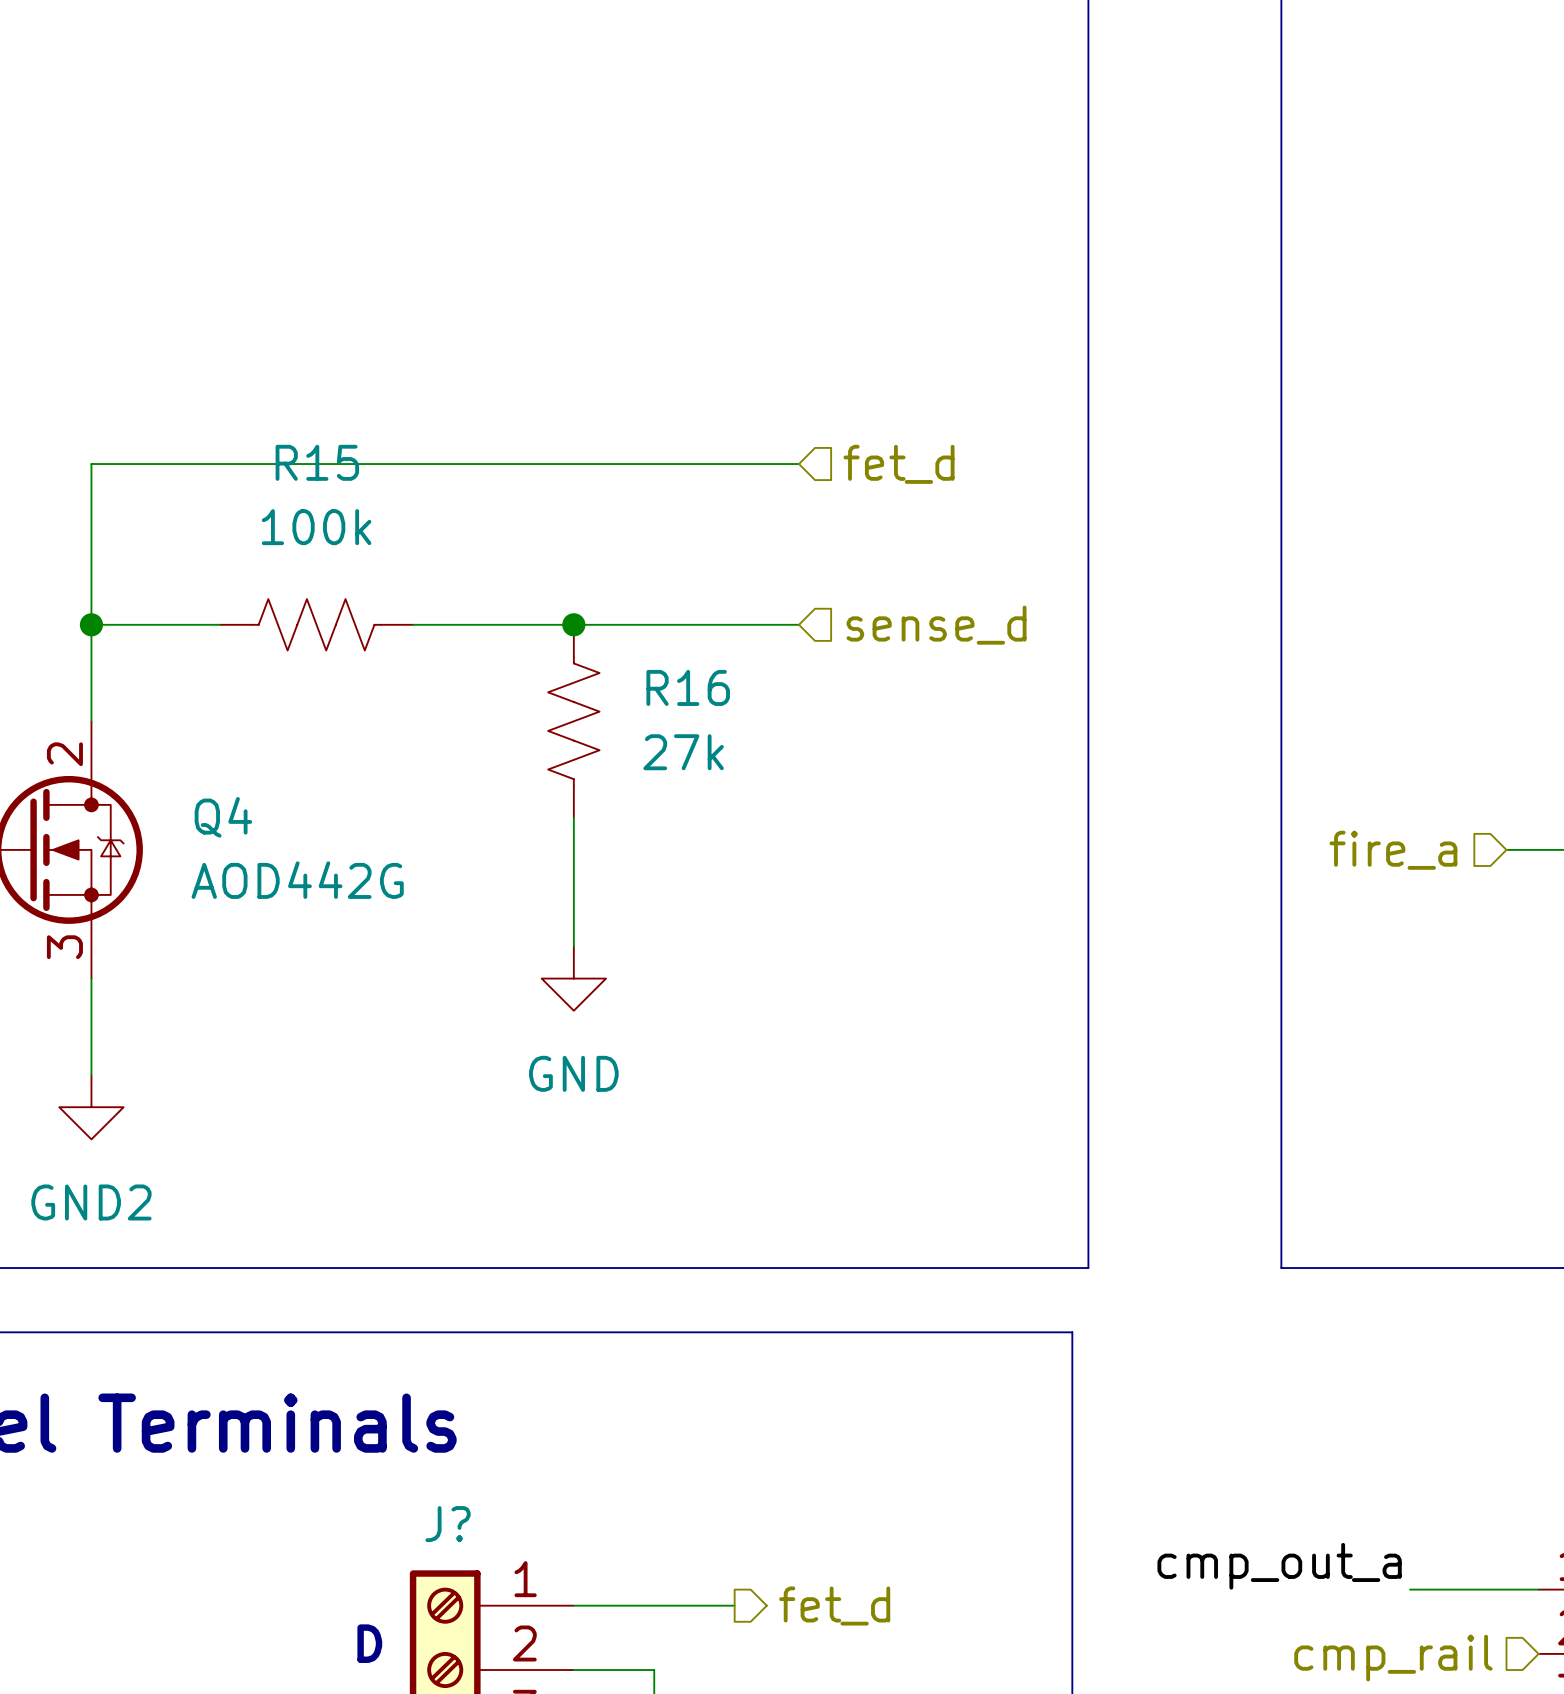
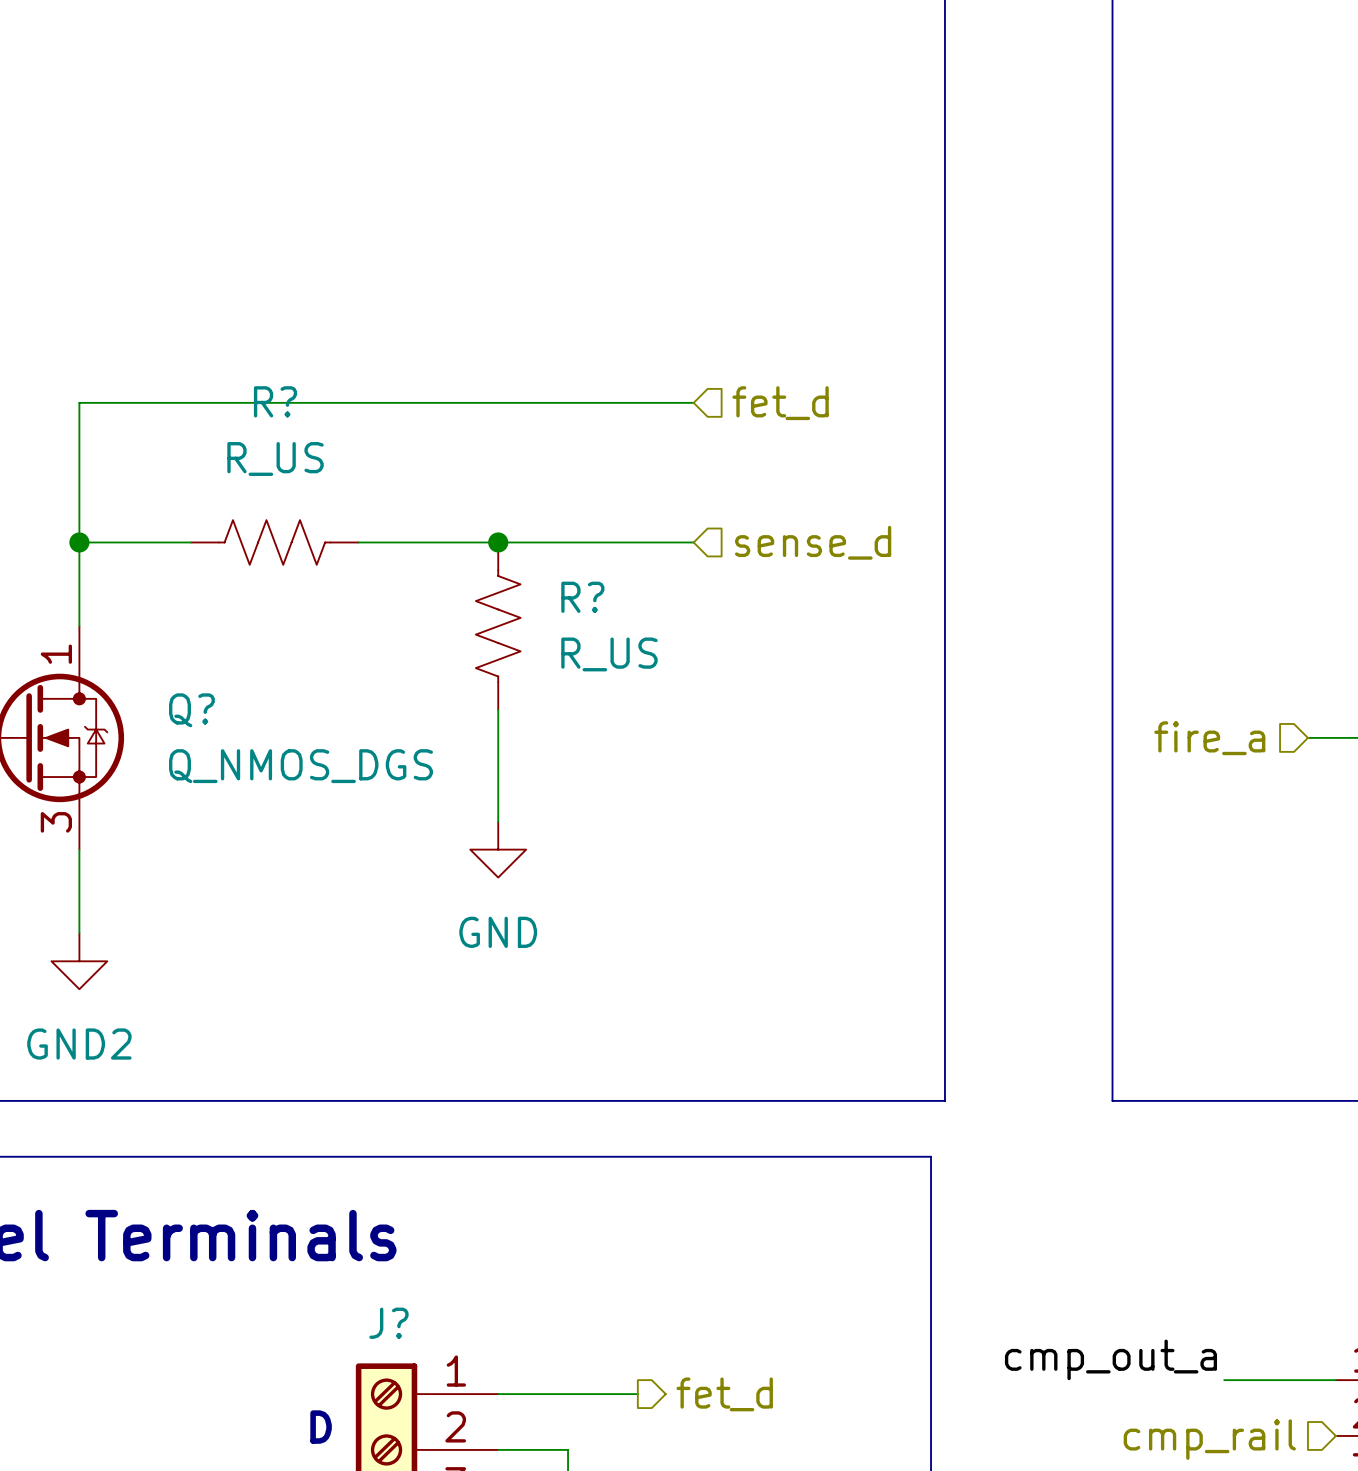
R15 name: R15 (317, 462) -> R? (275, 401)
R15 value: 100k (316, 527) -> R_US (275, 459)
R16 name: R16 (688, 687) -> R? (582, 597)
R16 value: 27k (683, 752) -> R_US (609, 654)
Q4 pin number: 2 (64, 754) -> 1 (56, 654)
Q4 name: Q4 (223, 817) -> Q? (191, 710)
Q4 value: AOD442G (297, 880) -> Q_NMOS_DGS (300, 766)

